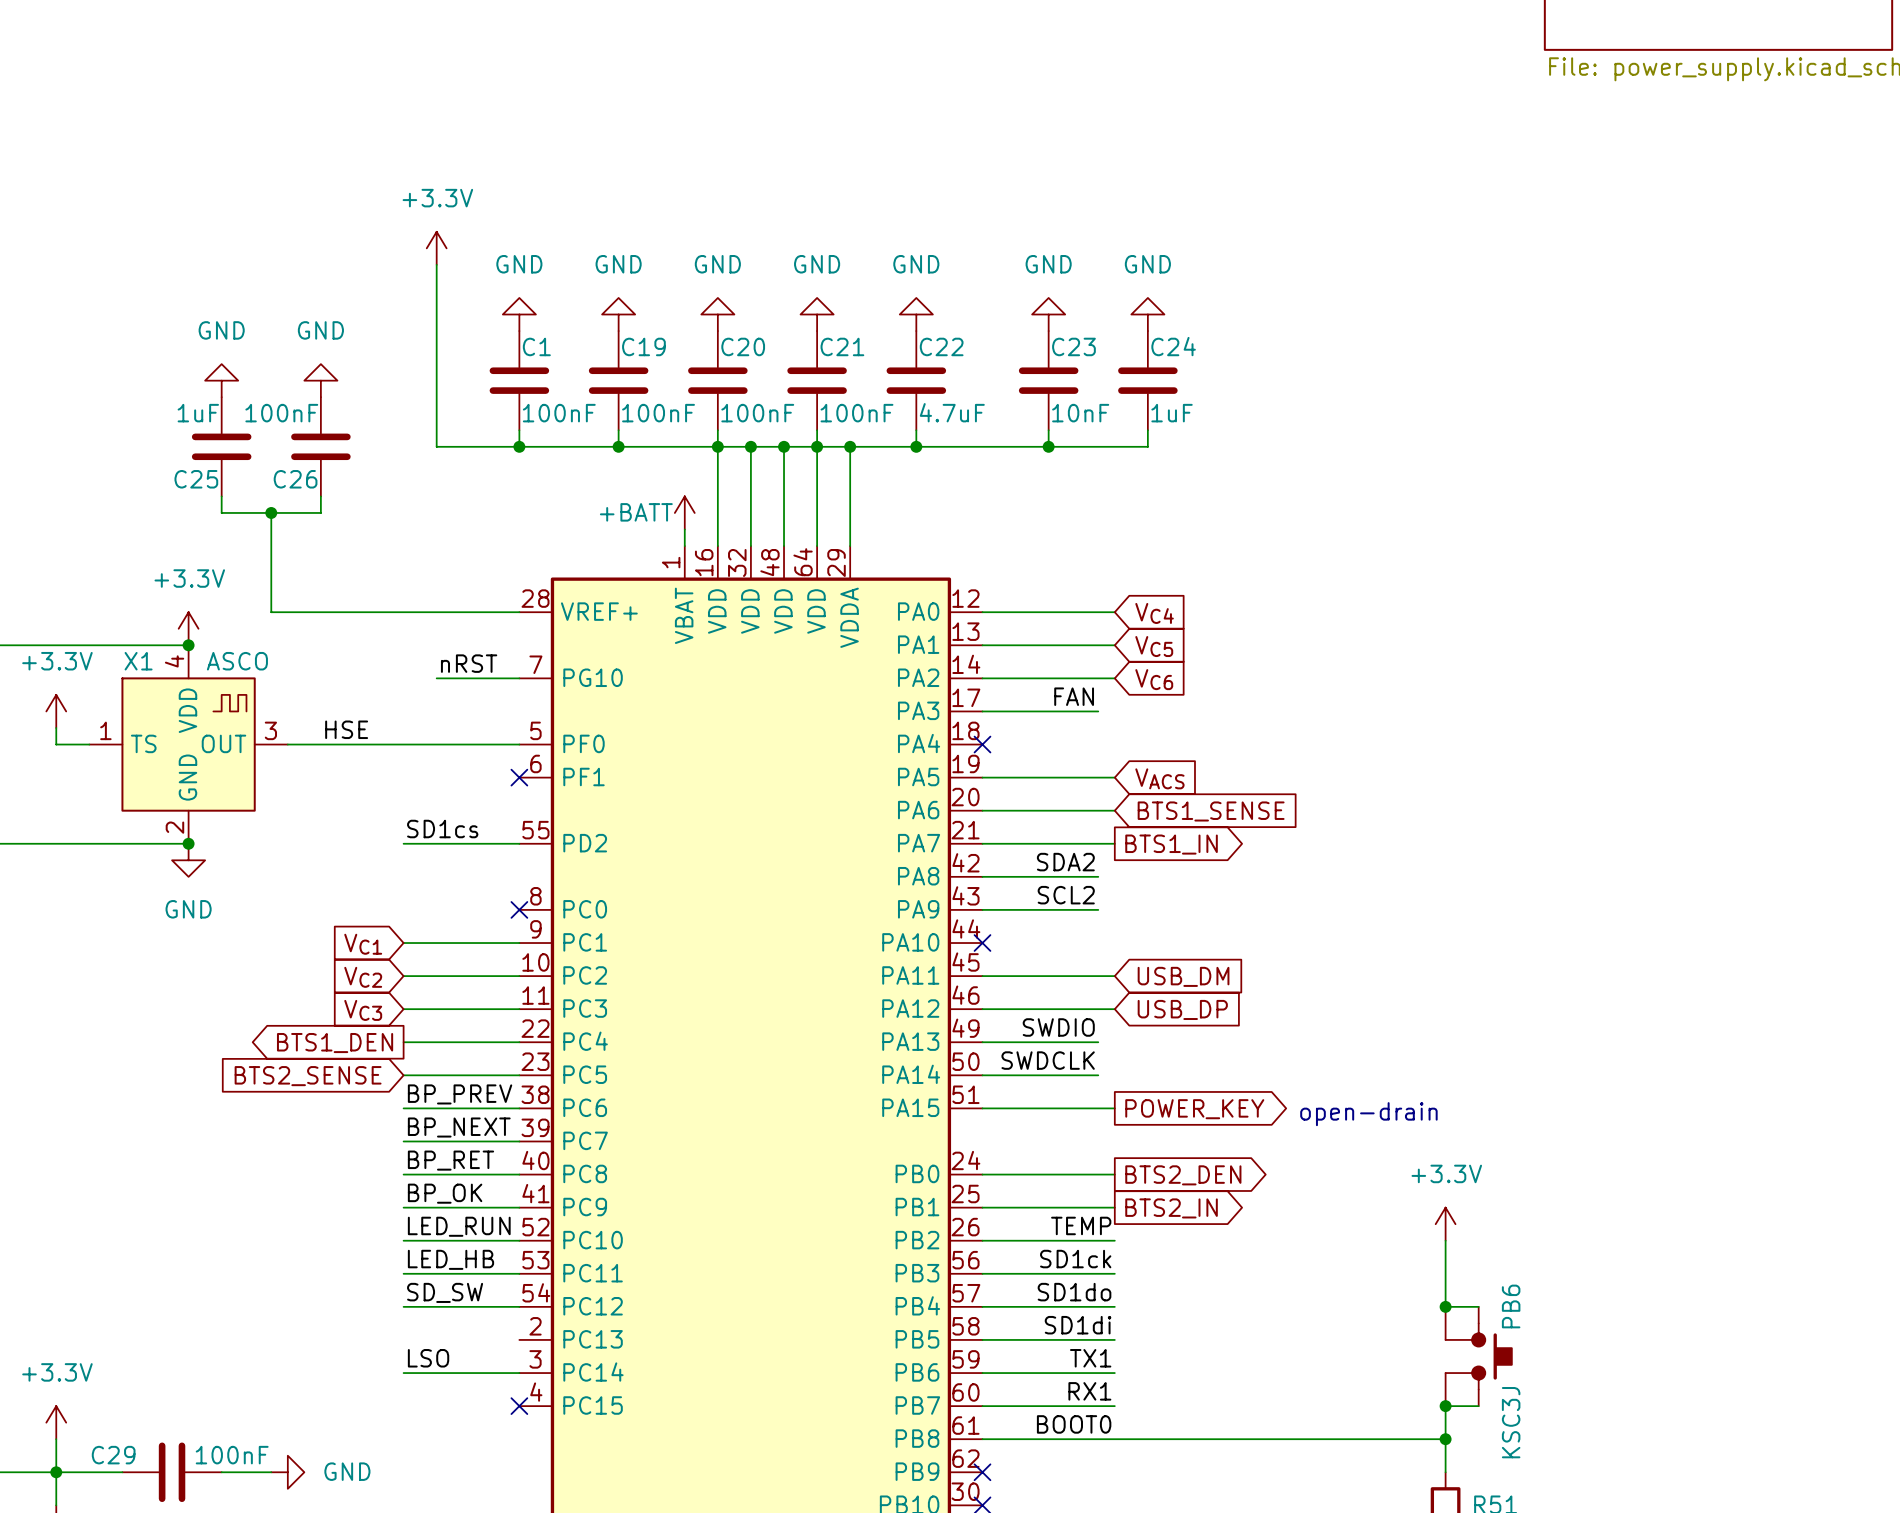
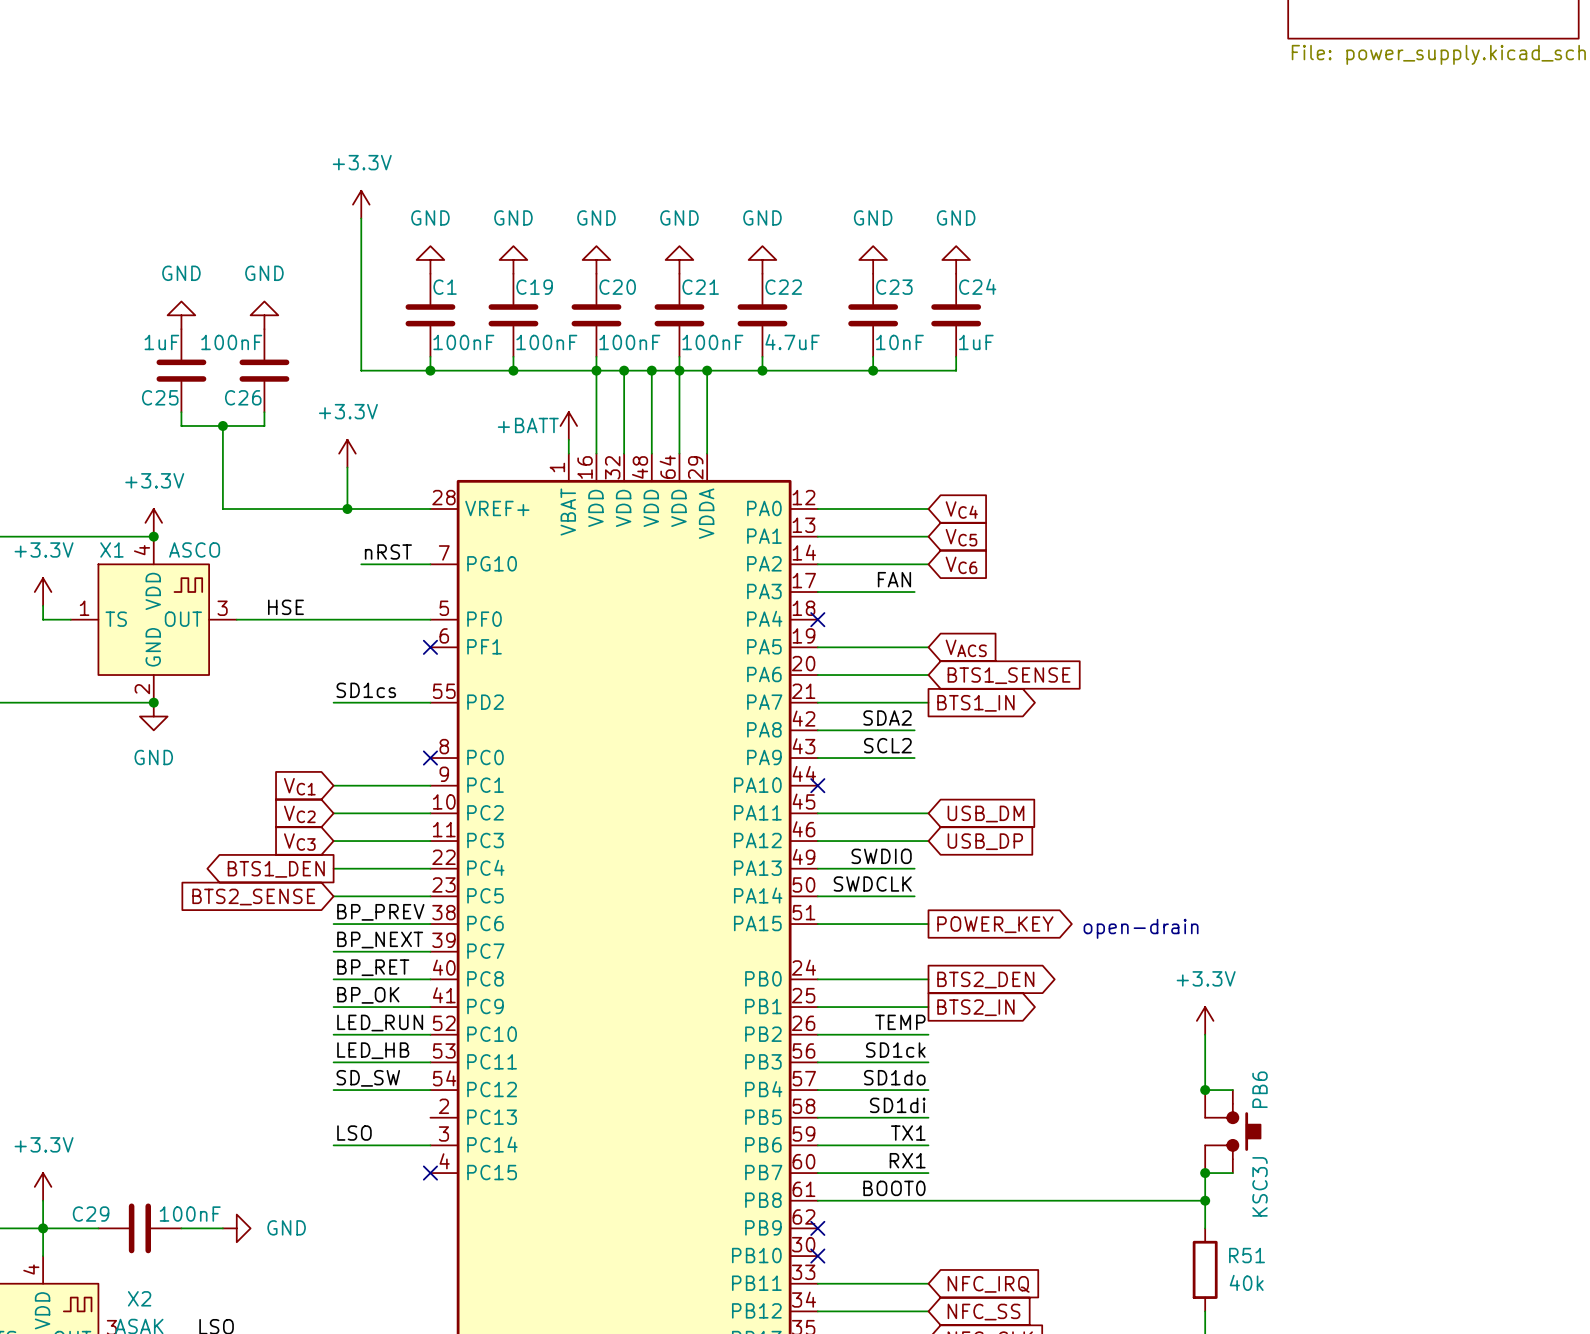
power symbol: none -> +3.3V (347, 453)
wire: none -> (347, 467) (347, 509)
junction: none -> (347, 509)

